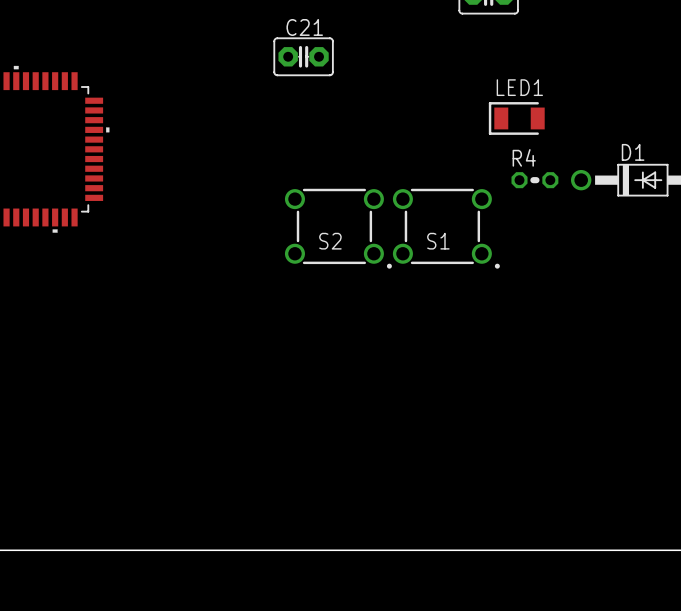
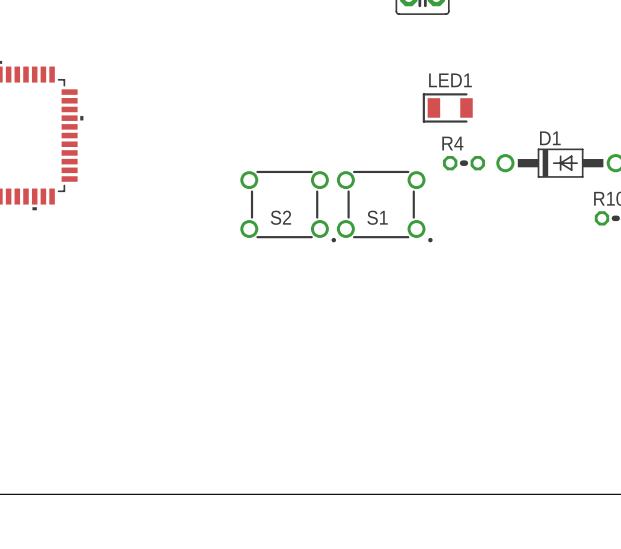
C21: (303, 56) -> none

